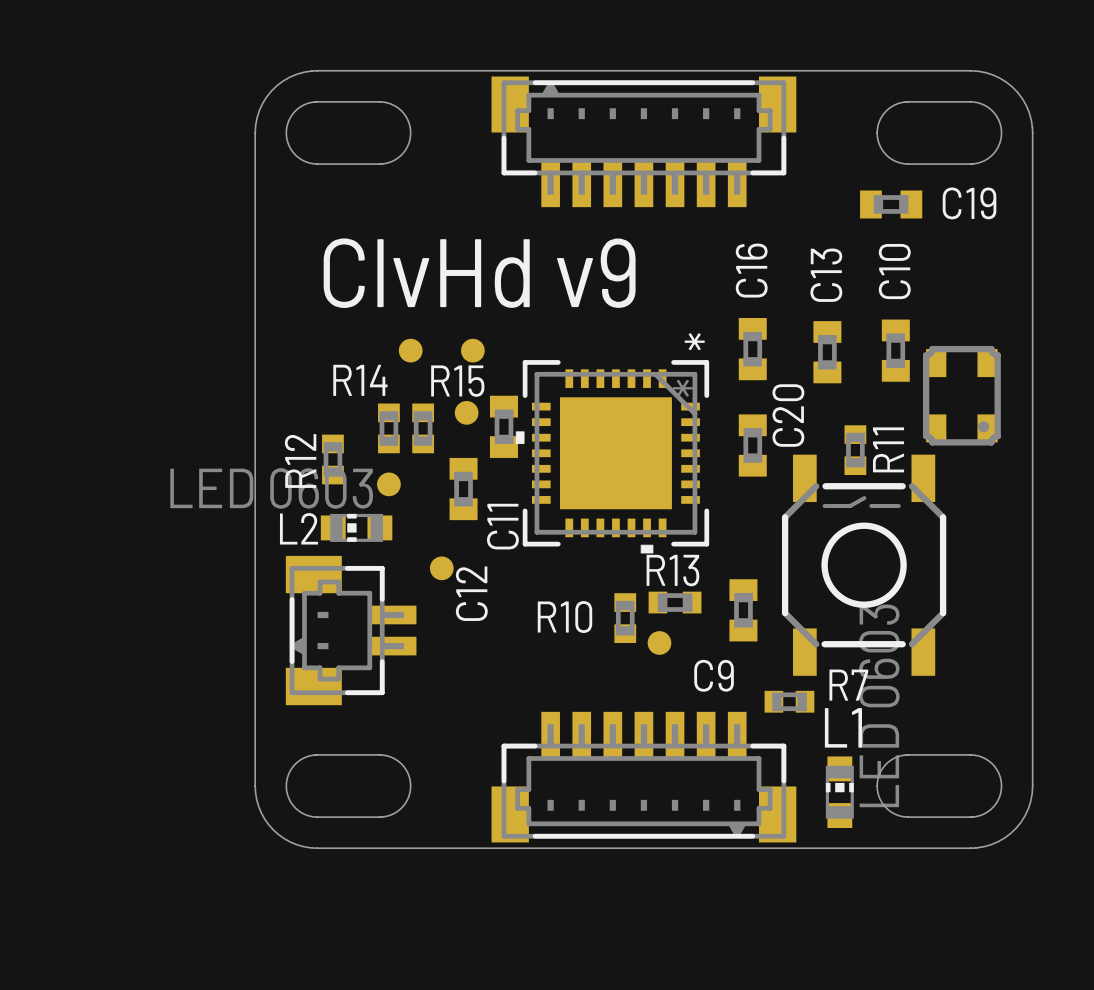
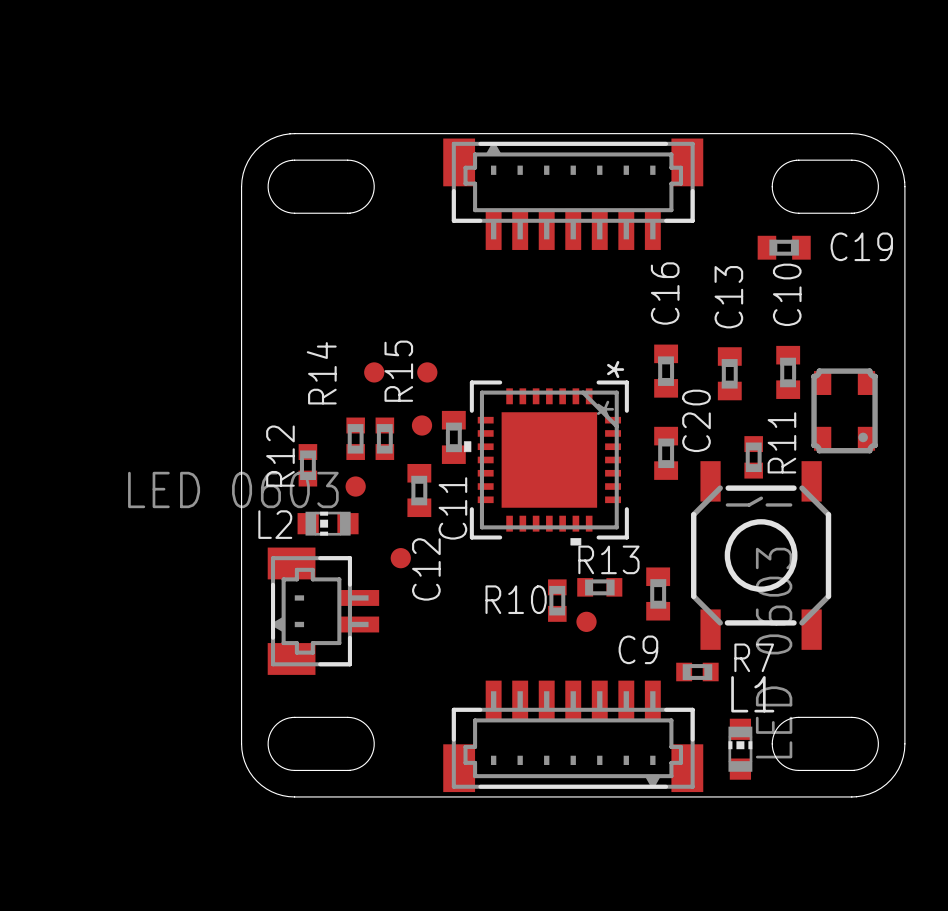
text: ClvHd v9 (479, 273) -> none
R14 name rotation: 0° (360, 380) -> 90° counterclockwise (321, 373)
R15 name rotation: 0° (457, 381) -> 90° counterclockwise (398, 371)

